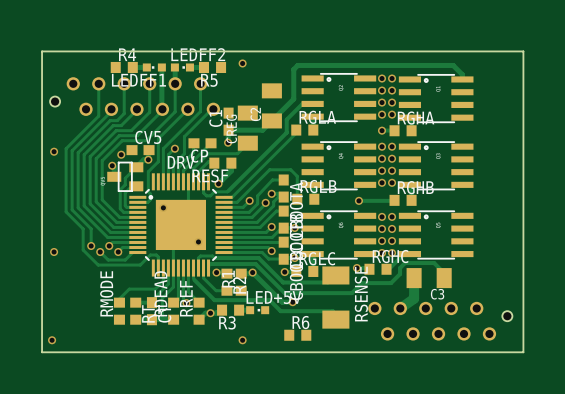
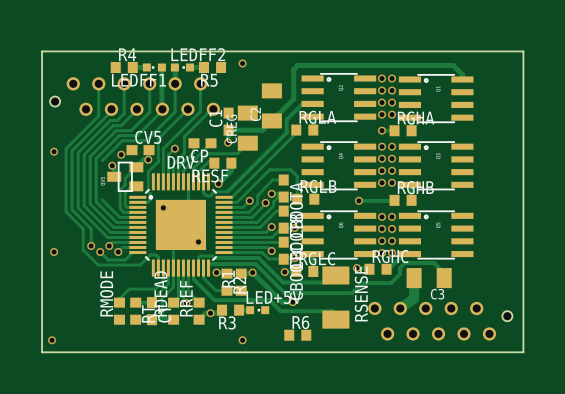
track: (102, 160) (102, 199) -> none

